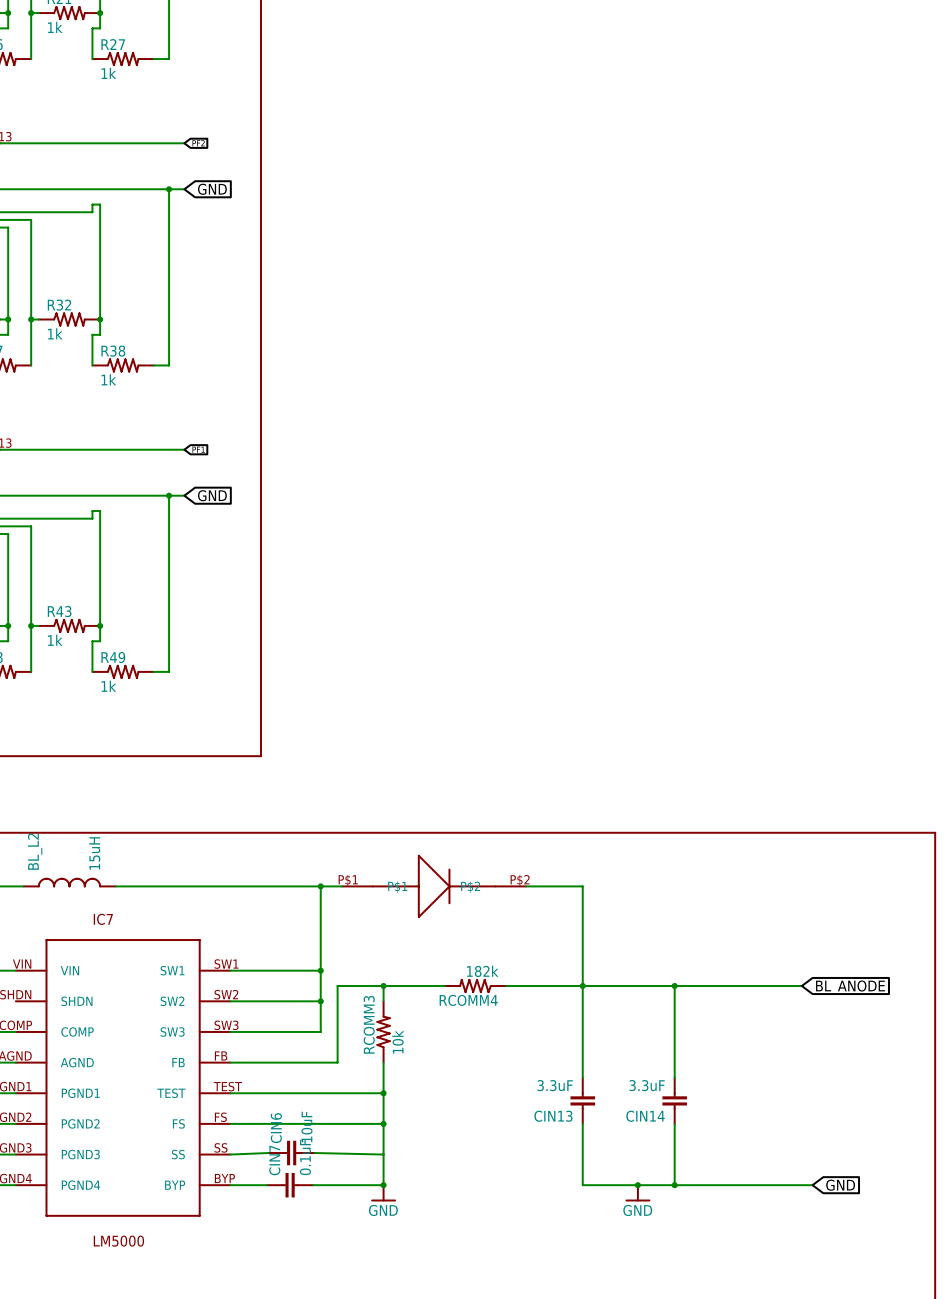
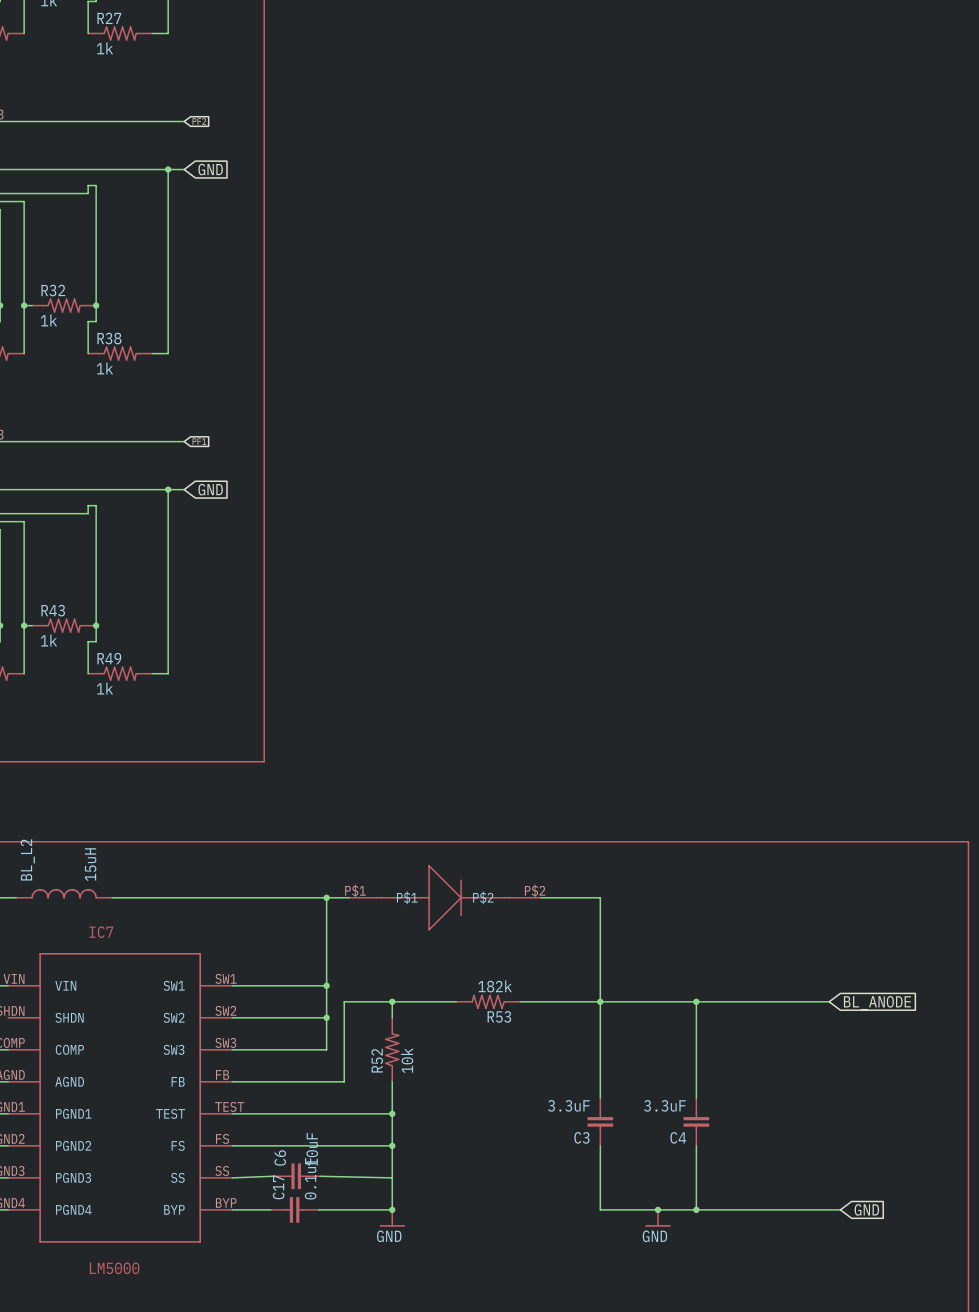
RCOMM4 name: RCOMM4 (468, 1000) -> R53 (499, 1016)
RCOMM3 name: RCOMM3 (369, 1024) -> R52 (377, 1060)
CIN13 name: CIN13 (553, 1116) -> C3 (581, 1137)
CIN14 name: CIN14 (645, 1116) -> C4 (678, 1137)
CIN6 name: CIN6 (276, 1128) -> C6 (280, 1157)
CIN7 name: CIN7 (274, 1160) -> C17 (278, 1187)

